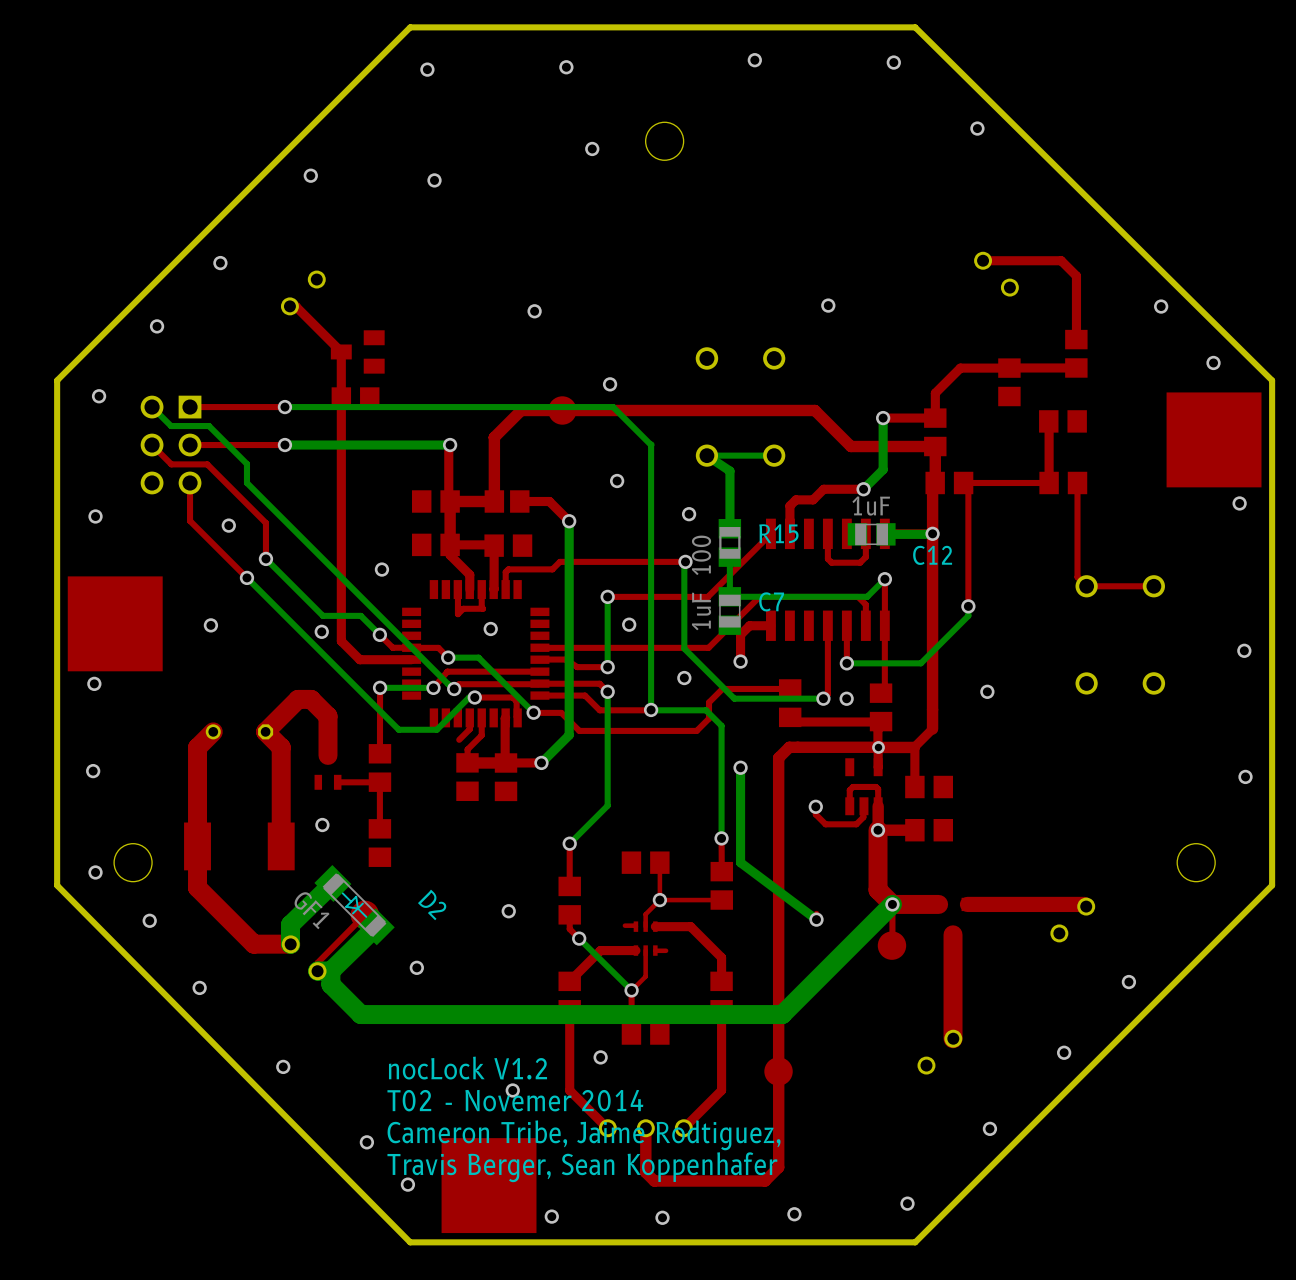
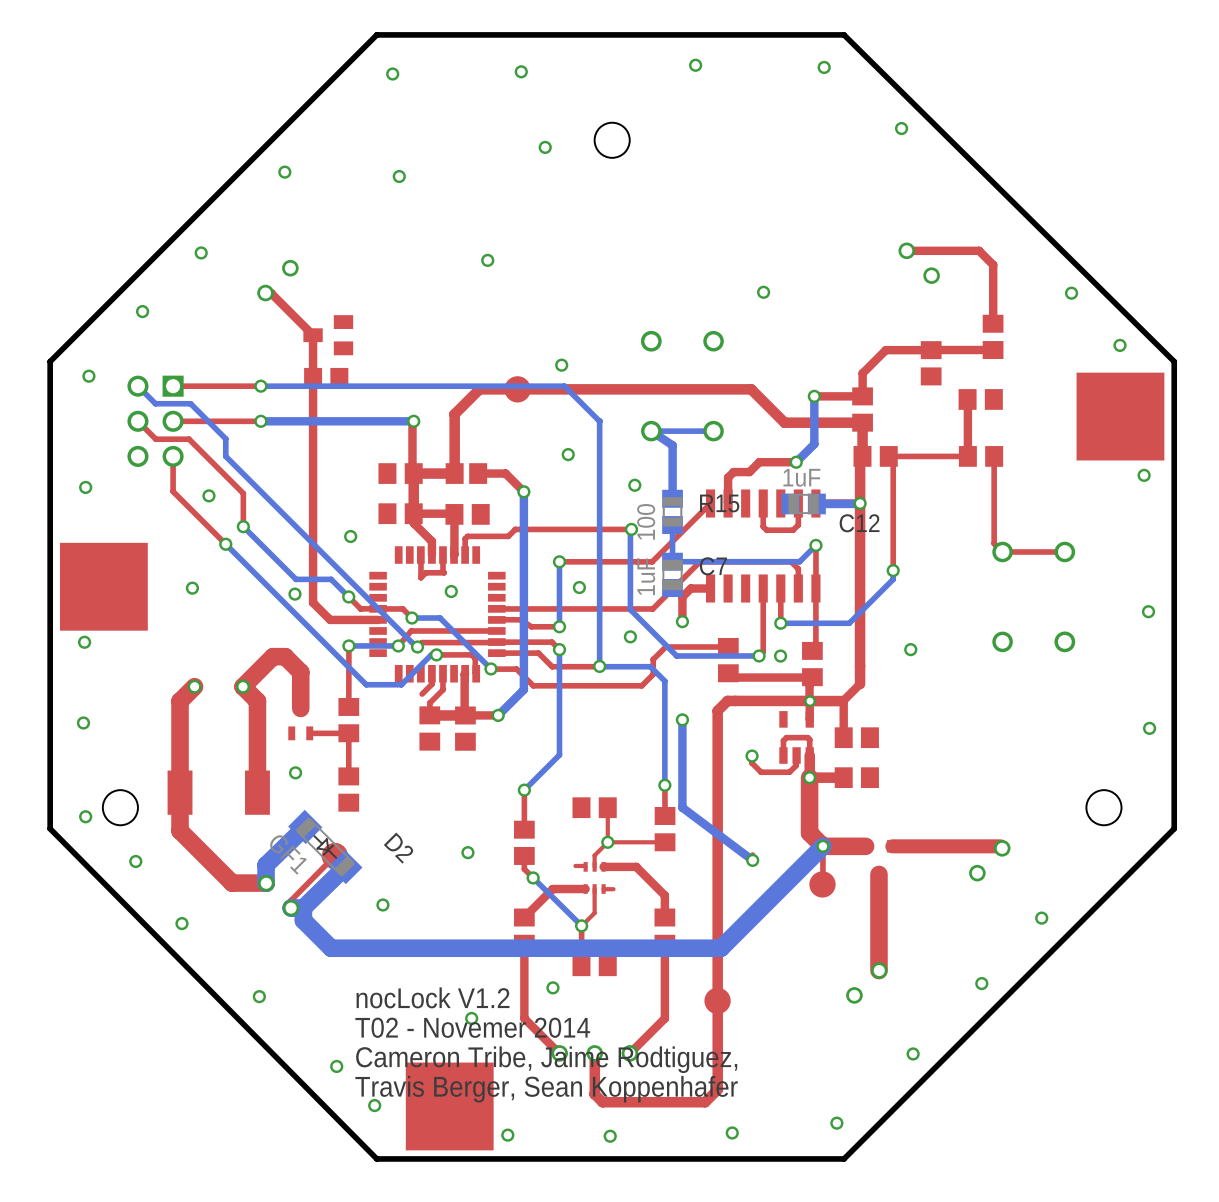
via position: (534, 311) -> (487, 260)

